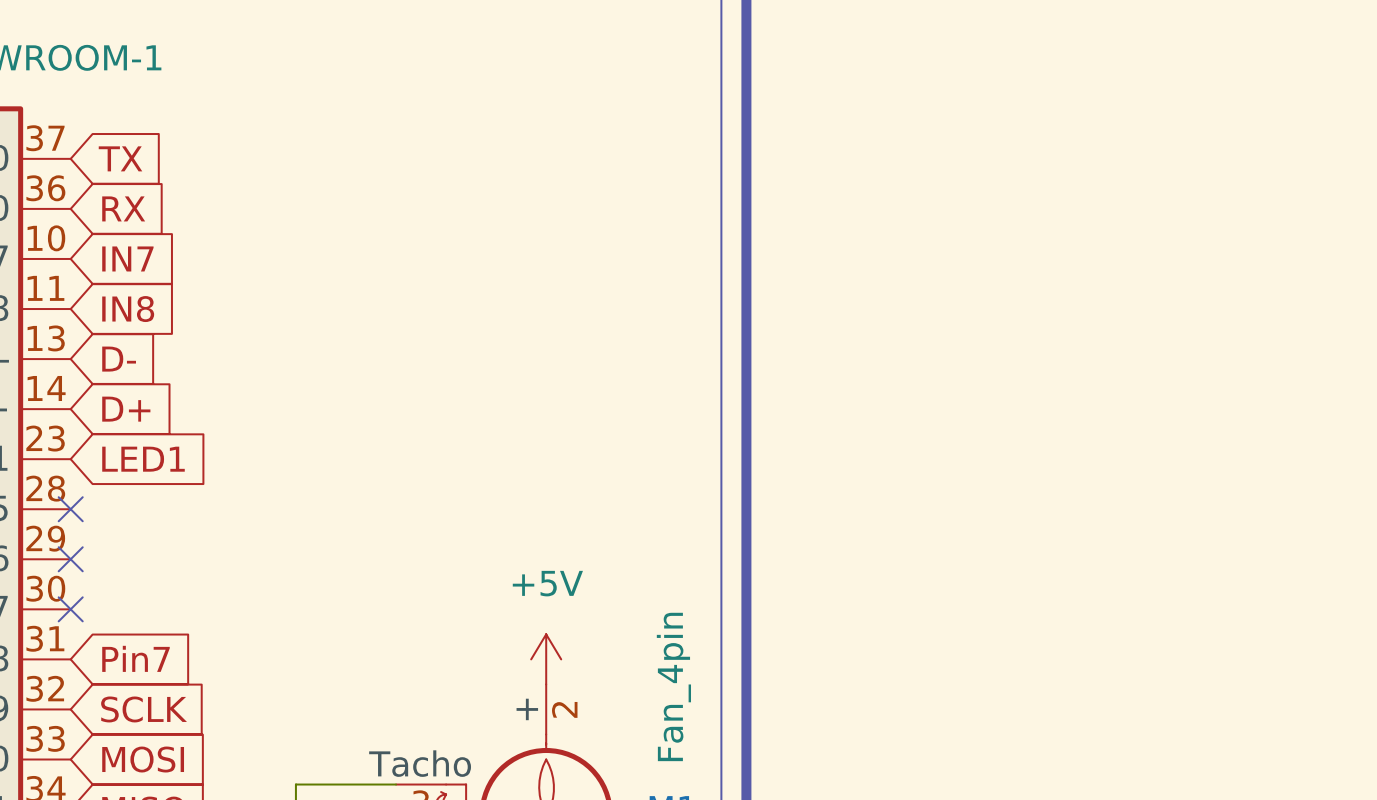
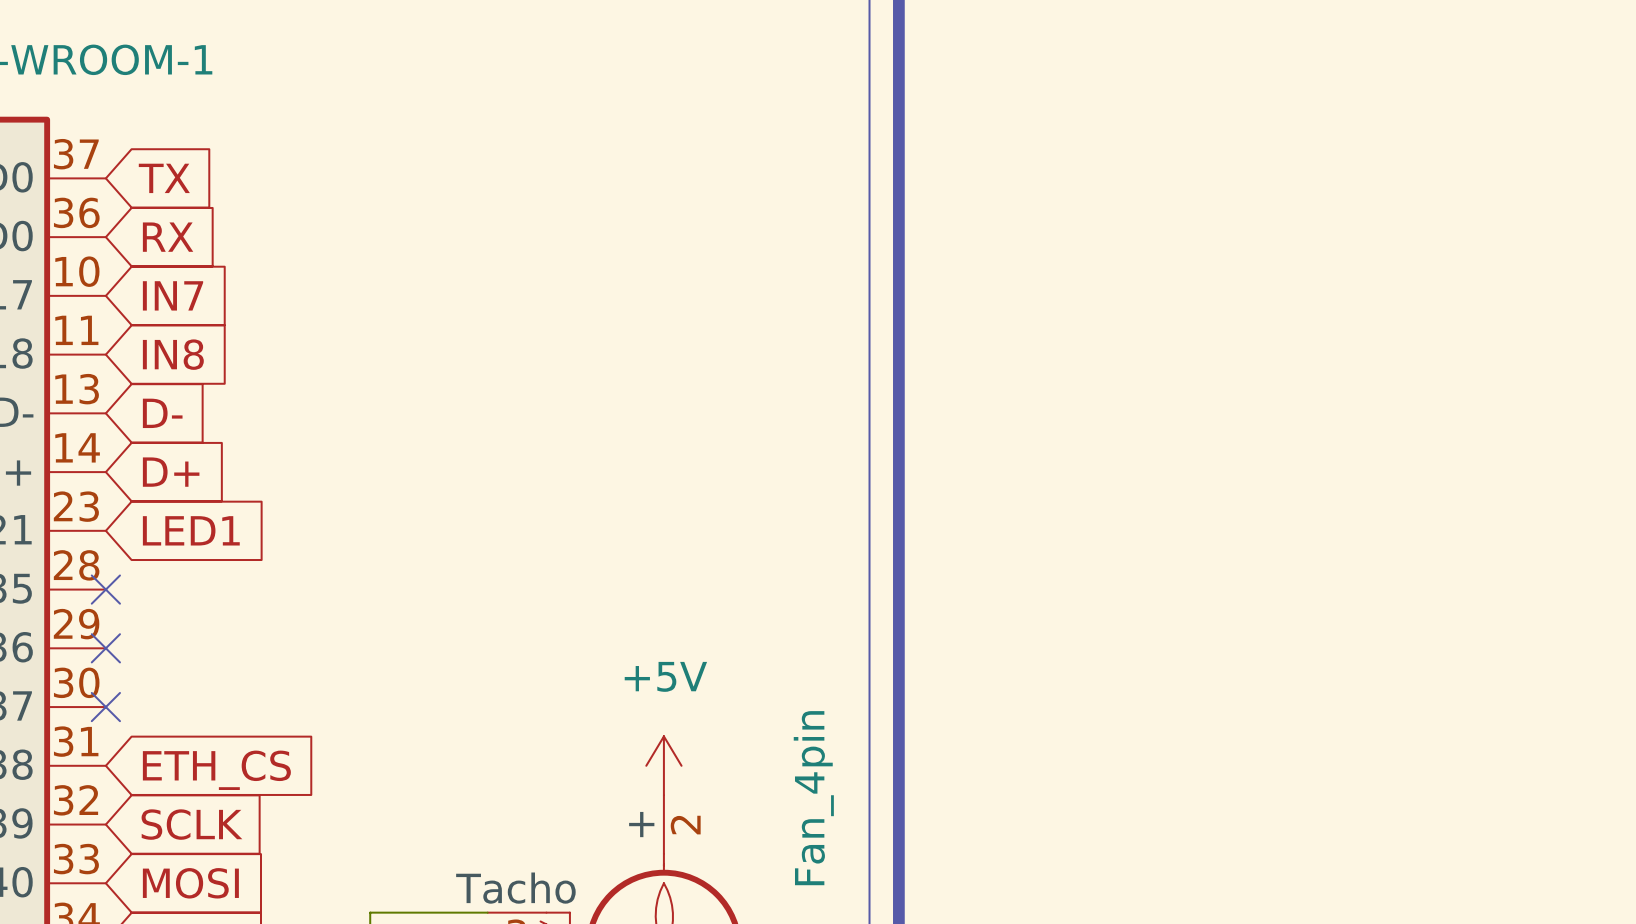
global label: Pin7 (135, 658) -> ETH_CS (216, 770)

